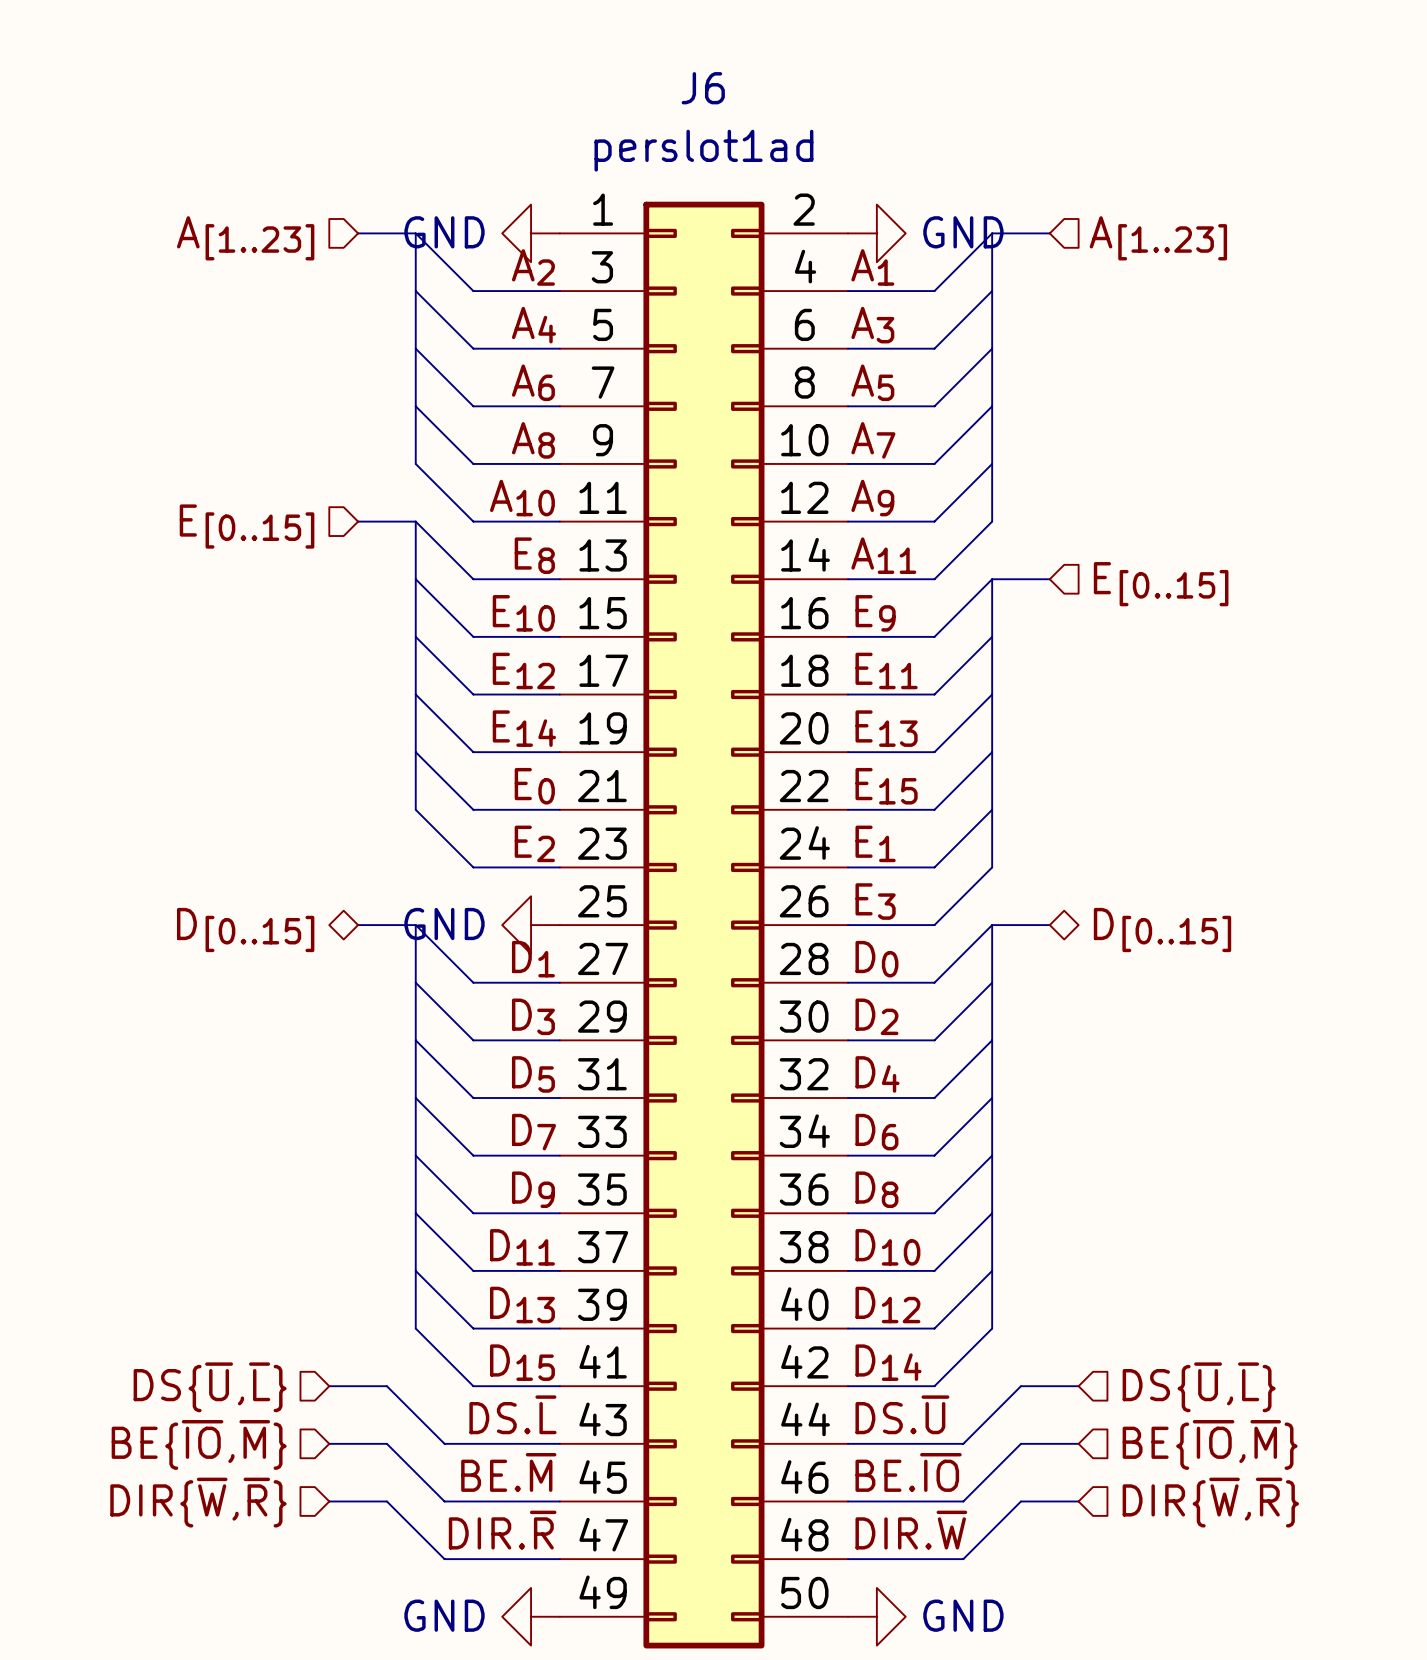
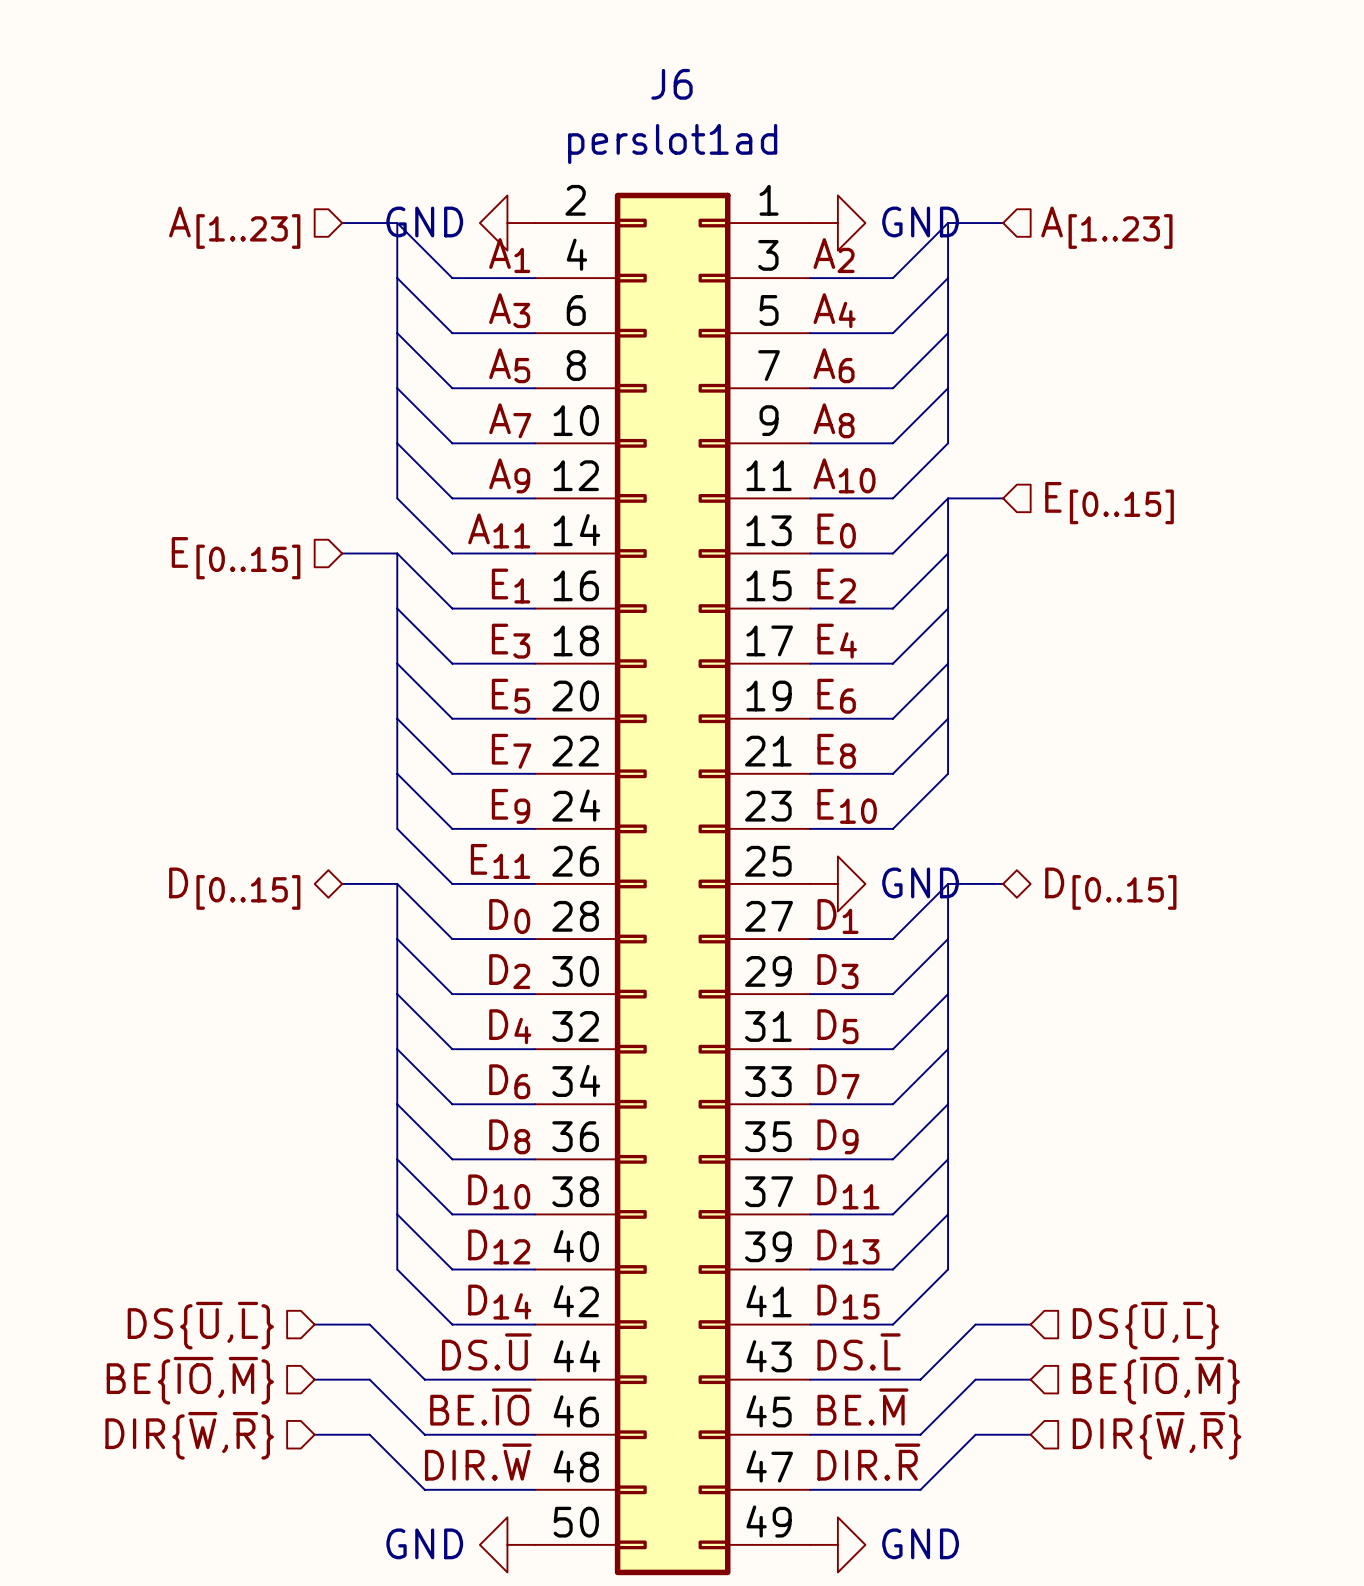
label: A2 (533, 267) -> A1 (509, 255)
label: A1 (872, 267) -> A2 (834, 255)
label: A4 (533, 325) -> A3 (509, 310)
label: A3 (872, 325) -> A4 (834, 310)
label: A6 (533, 382) -> A5 (509, 365)
label: A5 (872, 382) -> A6 (834, 365)
label: A8 (533, 440) -> A7 (510, 420)
label: A7 (873, 440) -> A8 (834, 420)
bus: none -> (397, 443) (397, 498)
bus: (992, 463) (992, 521) -> none
label: A10 (522, 498) -> A9 (509, 475)
label: A9 (872, 498) -> A10 (844, 475)
bus: (358, 521) (415, 521) (415, 579) -> (342, 553) (397, 553)
hierarchical label position: E[0..15] (247, 526) -> E[0..15] (236, 558)
label: E8 (534, 555) -> A11 (499, 530)
label: A11 (883, 555) -> E0 (836, 530)
bus: (992, 579) (1049, 579) -> (948, 553) (948, 498) (1003, 498)
hierarchical label position: E[0..15] (1161, 584) -> E[0..15] (1109, 503)
label: E10 (523, 613) -> E1 (511, 586)
label: E9 (875, 613) -> E2 (836, 586)
label: E12 (523, 670) -> E3 (511, 641)
label: E11 (886, 670) -> E4 (837, 641)
label: E14 (524, 728) -> E5 (511, 696)
label: E13 (886, 728) -> E6 (836, 696)
label: E0 (534, 786) -> E7 (511, 751)
label: E15 (886, 786) -> E8 (836, 751)
bus: none -> (397, 773) (397, 828)
bus: (992, 809) (992, 867) -> none
label: E2 (534, 843) -> E9 (511, 806)
label: E1 (875, 843) -> E10 (847, 806)
wire: none -> (397, 828) (452, 883) (534, 883)
wire: (992, 867) (934, 925) (848, 925) -> none
label: none -> E11 (500, 861)
label: E3 (875, 901) -> none
power symbol rotation: 0° (531, 925) -> 180° (837, 883)
power symbol position: GND (531, 925) -> GND (837, 883)
J6 flip: as is (703, 925) -> left-right (672, 883)
label: D1 (533, 959) -> D0 (509, 916)
label: D0 (876, 959) -> D1 (837, 916)
label: D3 (533, 1016) -> D2 (509, 971)
label: D2 (876, 1016) -> D3 (837, 971)
label: D5 (533, 1074) -> D4 (510, 1026)
label: D4 (877, 1074) -> D5 (837, 1026)
label: D7 (533, 1132) -> D6 (509, 1081)
label: D6 (876, 1132) -> D7 (838, 1081)
label: D9 (533, 1189) -> D8 (509, 1136)
label: D8 (876, 1189) -> D9 (837, 1136)
label: D11 (522, 1247) -> D10 (499, 1191)
label: D10 (887, 1247) -> D11 (848, 1191)
label: D13 (522, 1305) -> D12 (499, 1246)
label: D12 (887, 1305) -> D13 (848, 1246)
label: D15 (522, 1362) -> D14 (499, 1302)
label: D14 (888, 1362) -> D15 (848, 1302)
label: DS.~{L} (512, 1414) -> DS.~{U} (486, 1351)
label: DS.~{U} (902, 1414) -> DS.~{L} (859, 1351)
label: BE.~{M} (508, 1472) -> BE.~{IO} (480, 1406)
label: BE.~{IO} (908, 1472) -> BE.~{M} (862, 1406)
label: DIR.~{R} (502, 1530) -> DIR.~{W} (478, 1462)
label: DIR.~{W} (911, 1530) -> DIR.~{R} (868, 1462)

